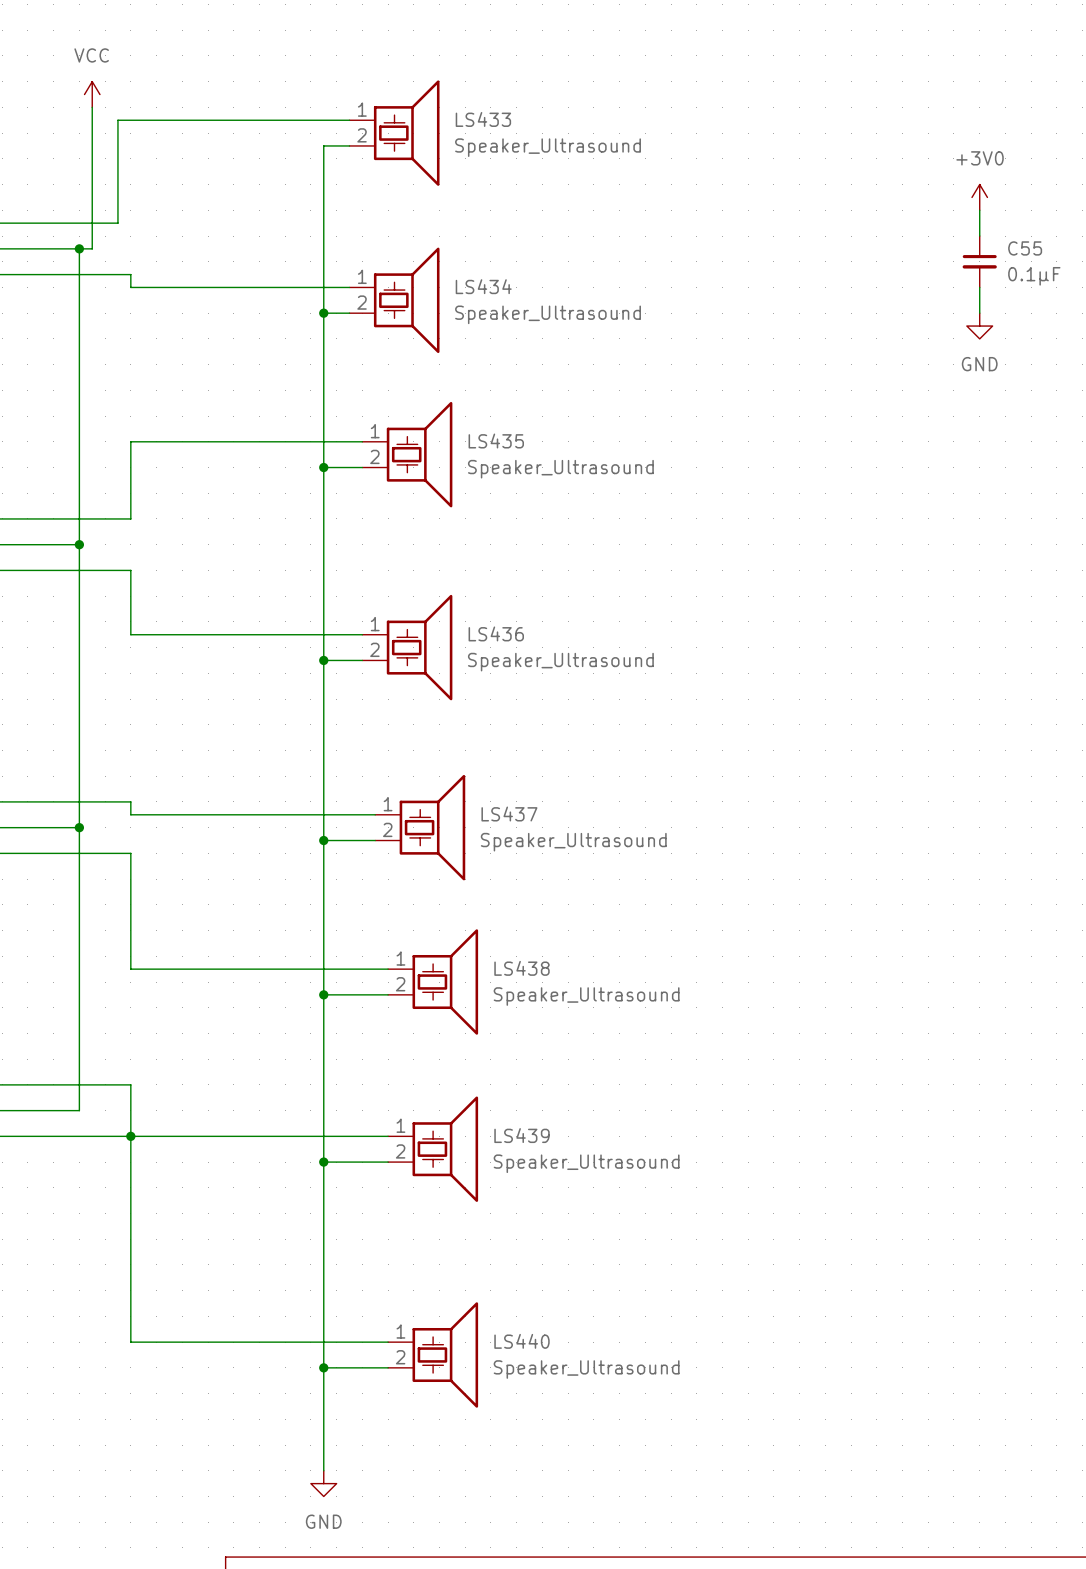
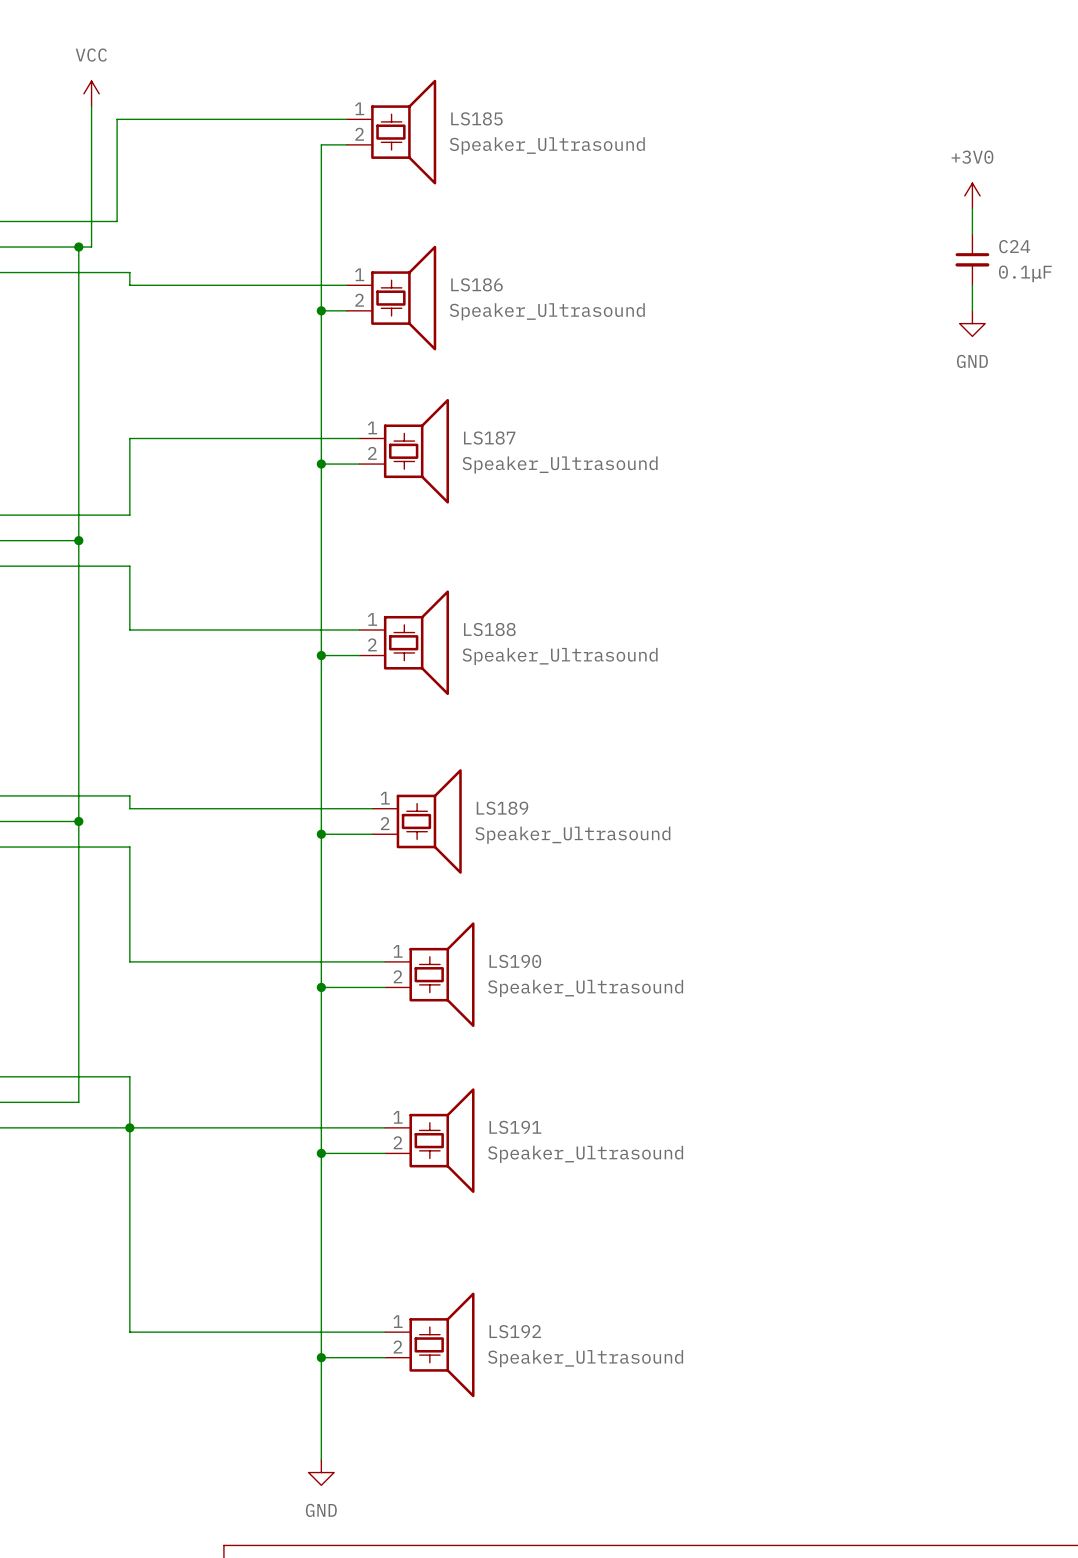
LS433 name: LS433 (483, 119) -> LS185 (476, 118)
C55 name: C55 (1025, 248) -> C24 (1014, 246)
LS434 name: LS434 (483, 286) -> LS186 (476, 284)
LS435 name: LS435 (496, 441) -> LS187 (489, 438)
LS436 name: LS436 (496, 633) -> LS188 (489, 629)
LS437 name: LS437 (509, 814) -> LS189 (502, 808)
LS438 name: LS438 (521, 968) -> LS190 (515, 961)
LS439 name: LS439 (521, 1135) -> LS191 (515, 1127)
LS440 name: LS440 (521, 1341) -> LS192 (515, 1331)

